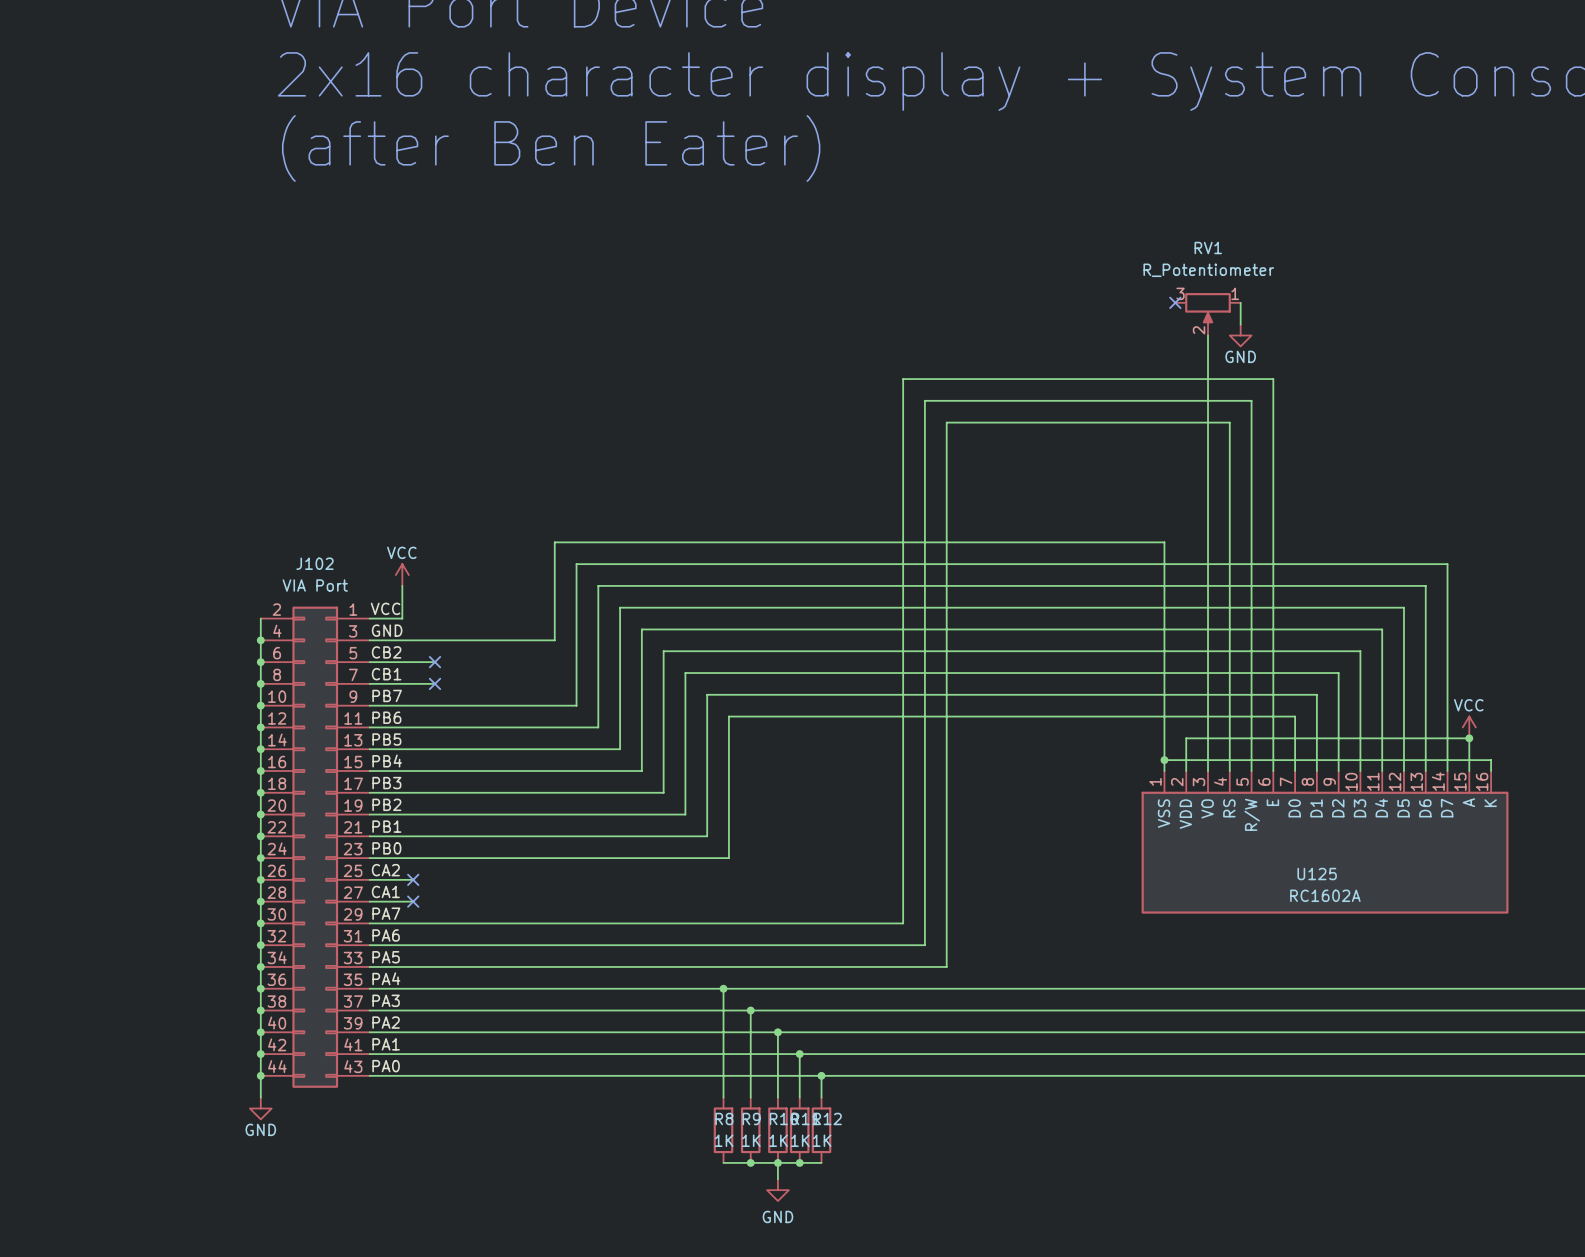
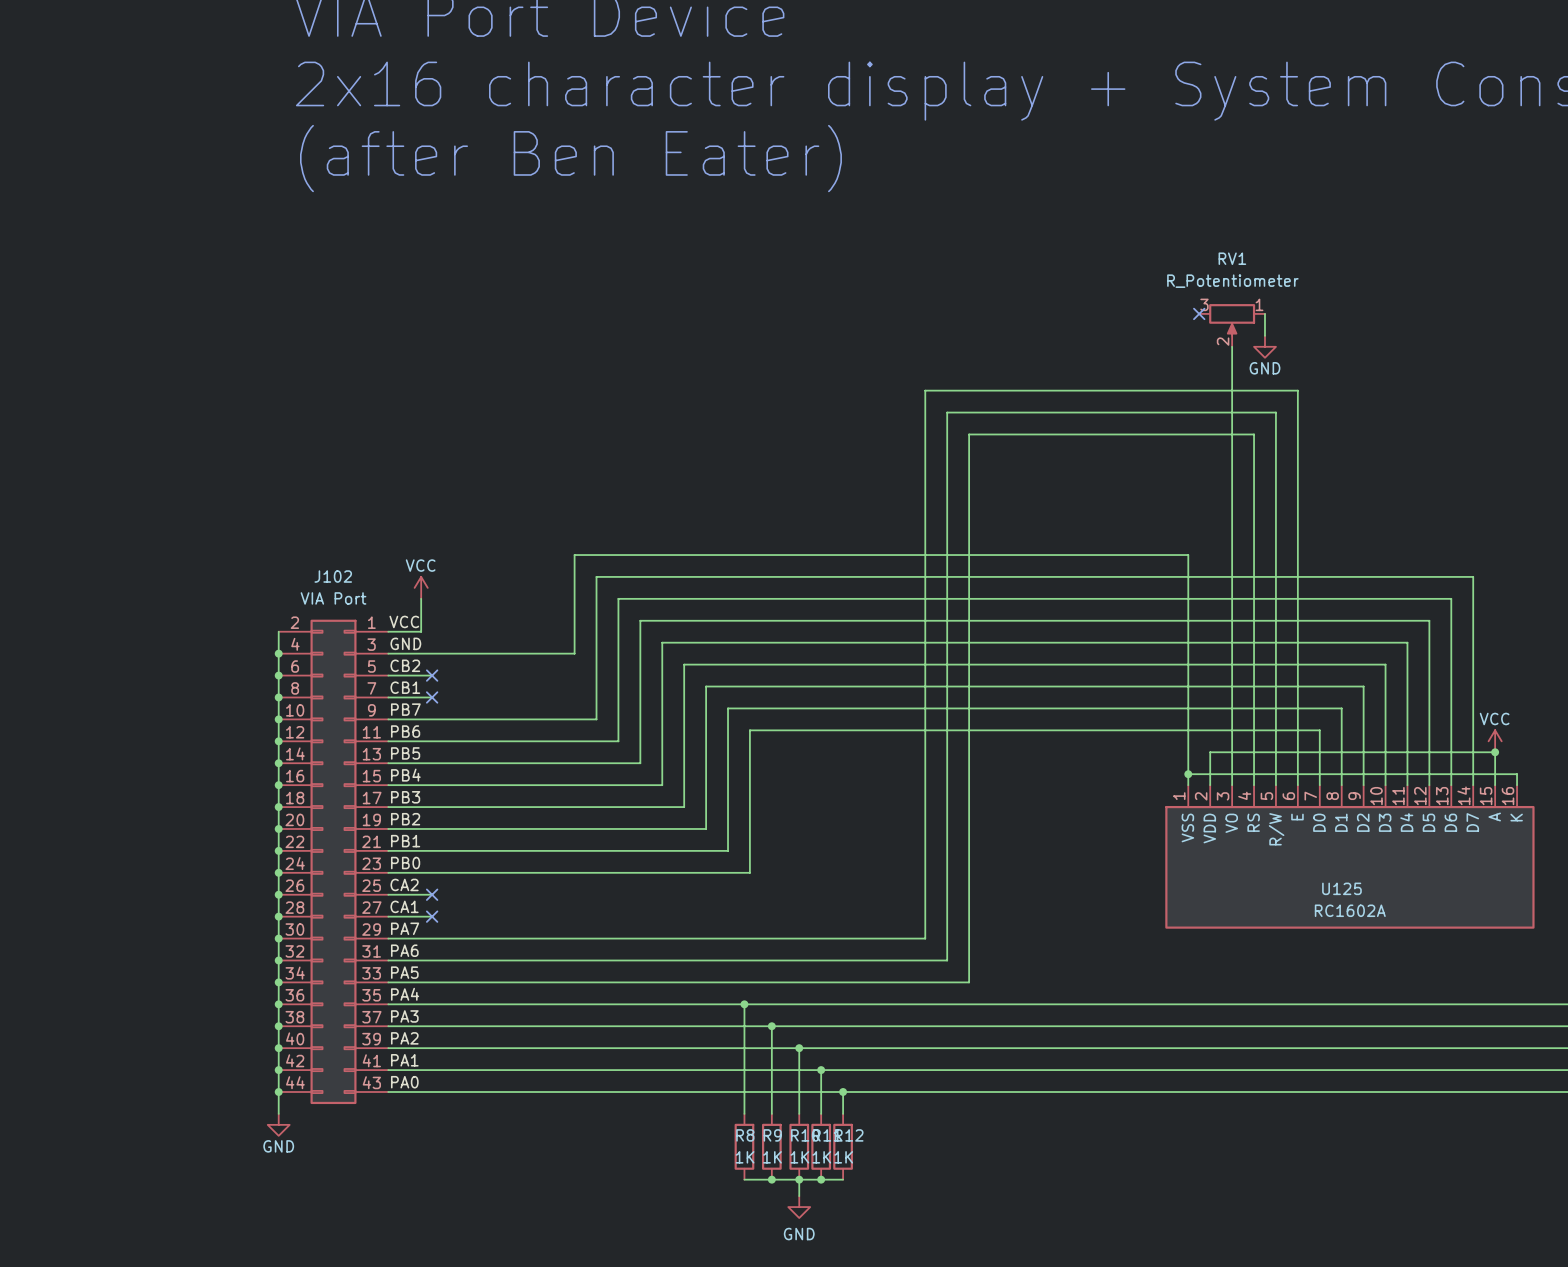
wire: (413, 662) (435, 662) -> none
no-connect mark: none -> (432, 675)
no-connect mark: (435, 662) -> none
wire: (413, 683) (435, 683) -> none
no-connect mark: none -> (432, 697)
no-connect mark: (435, 683) -> none

